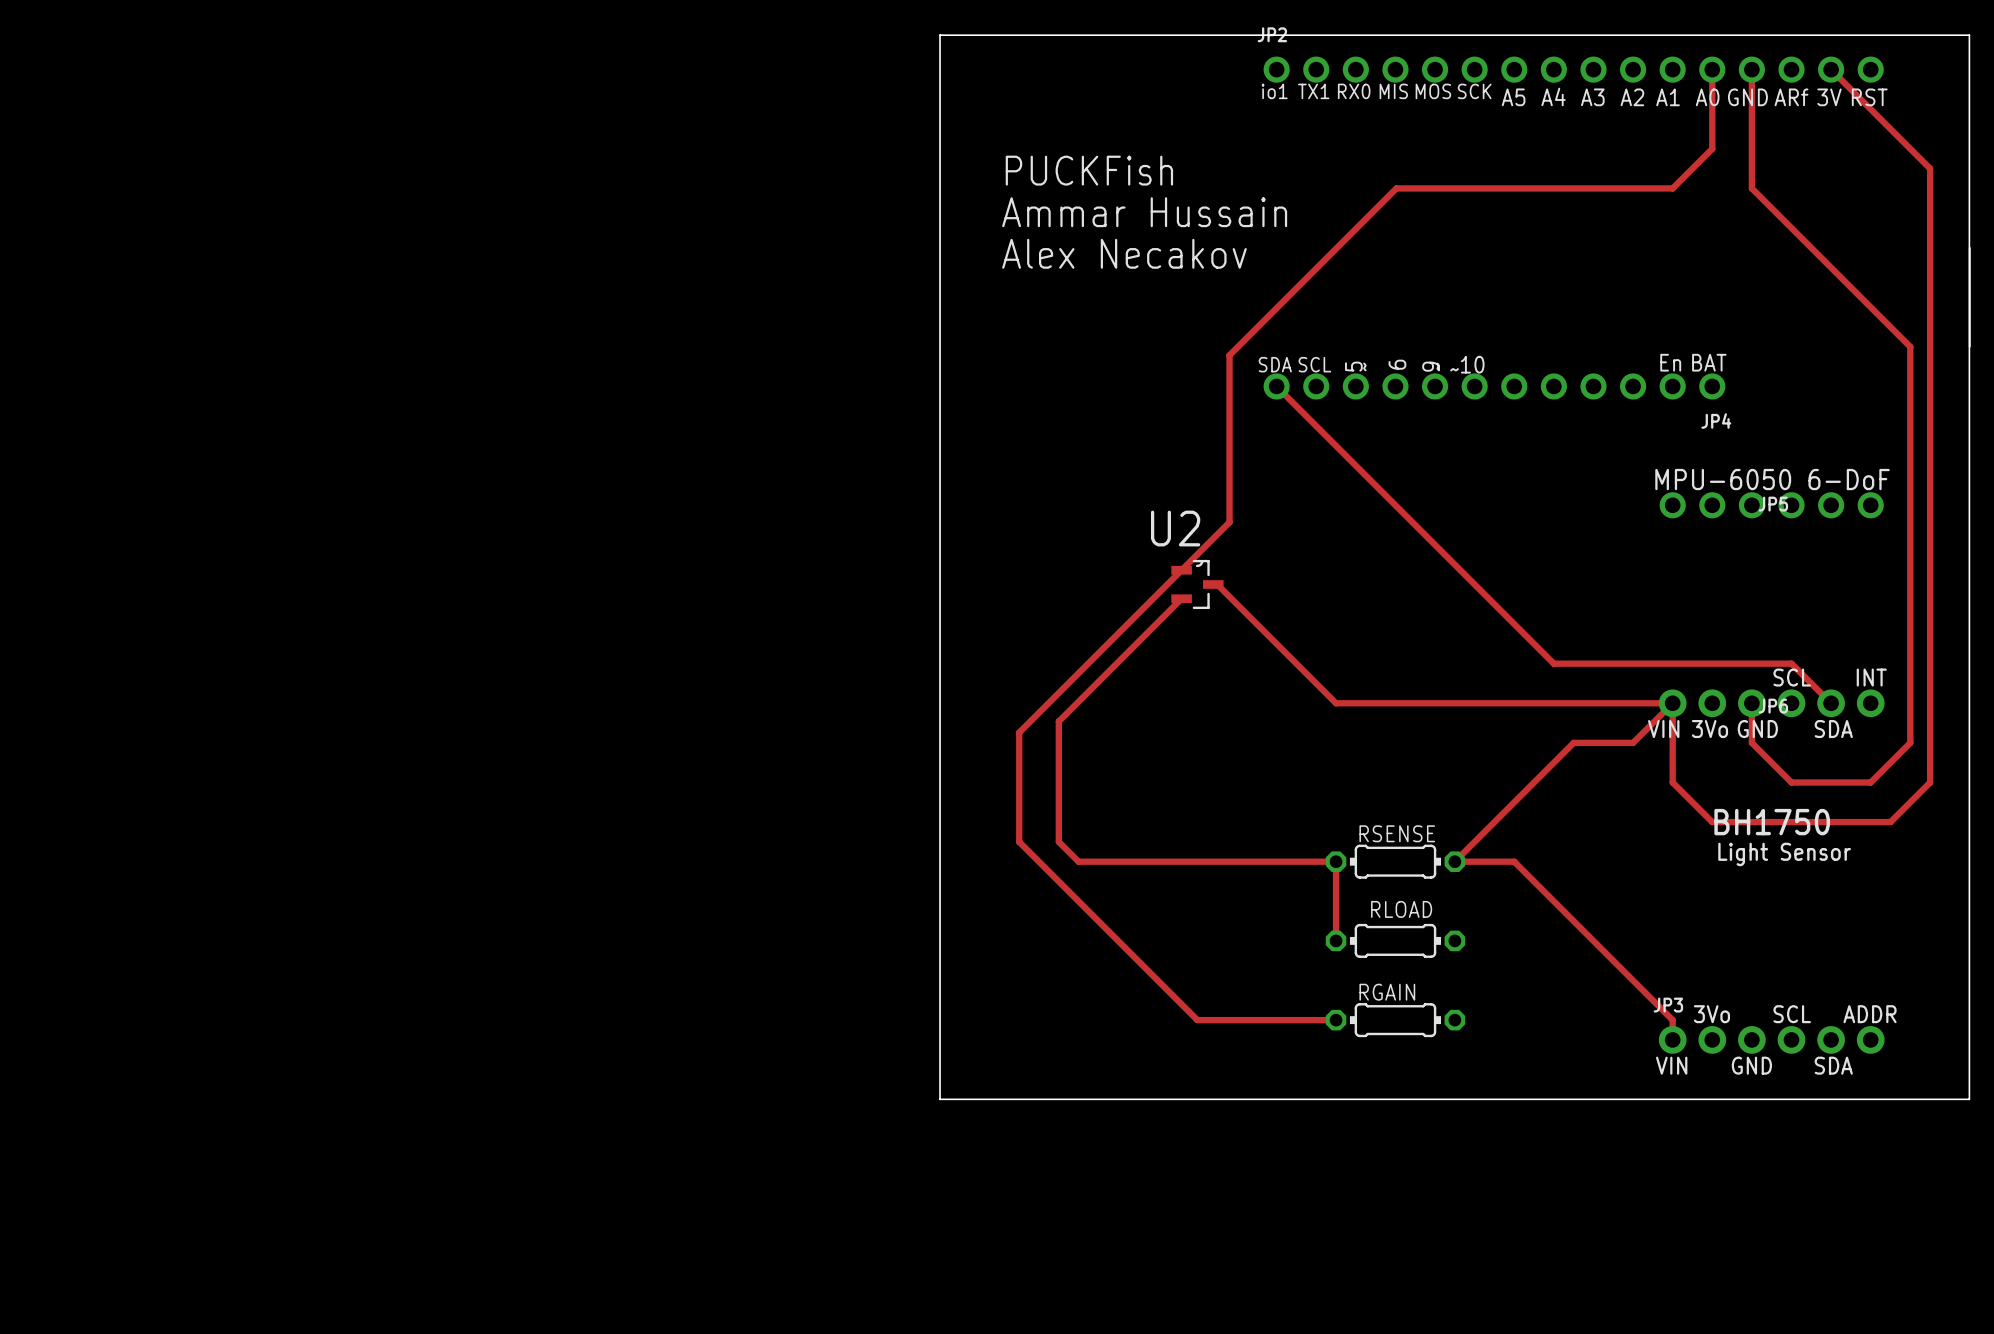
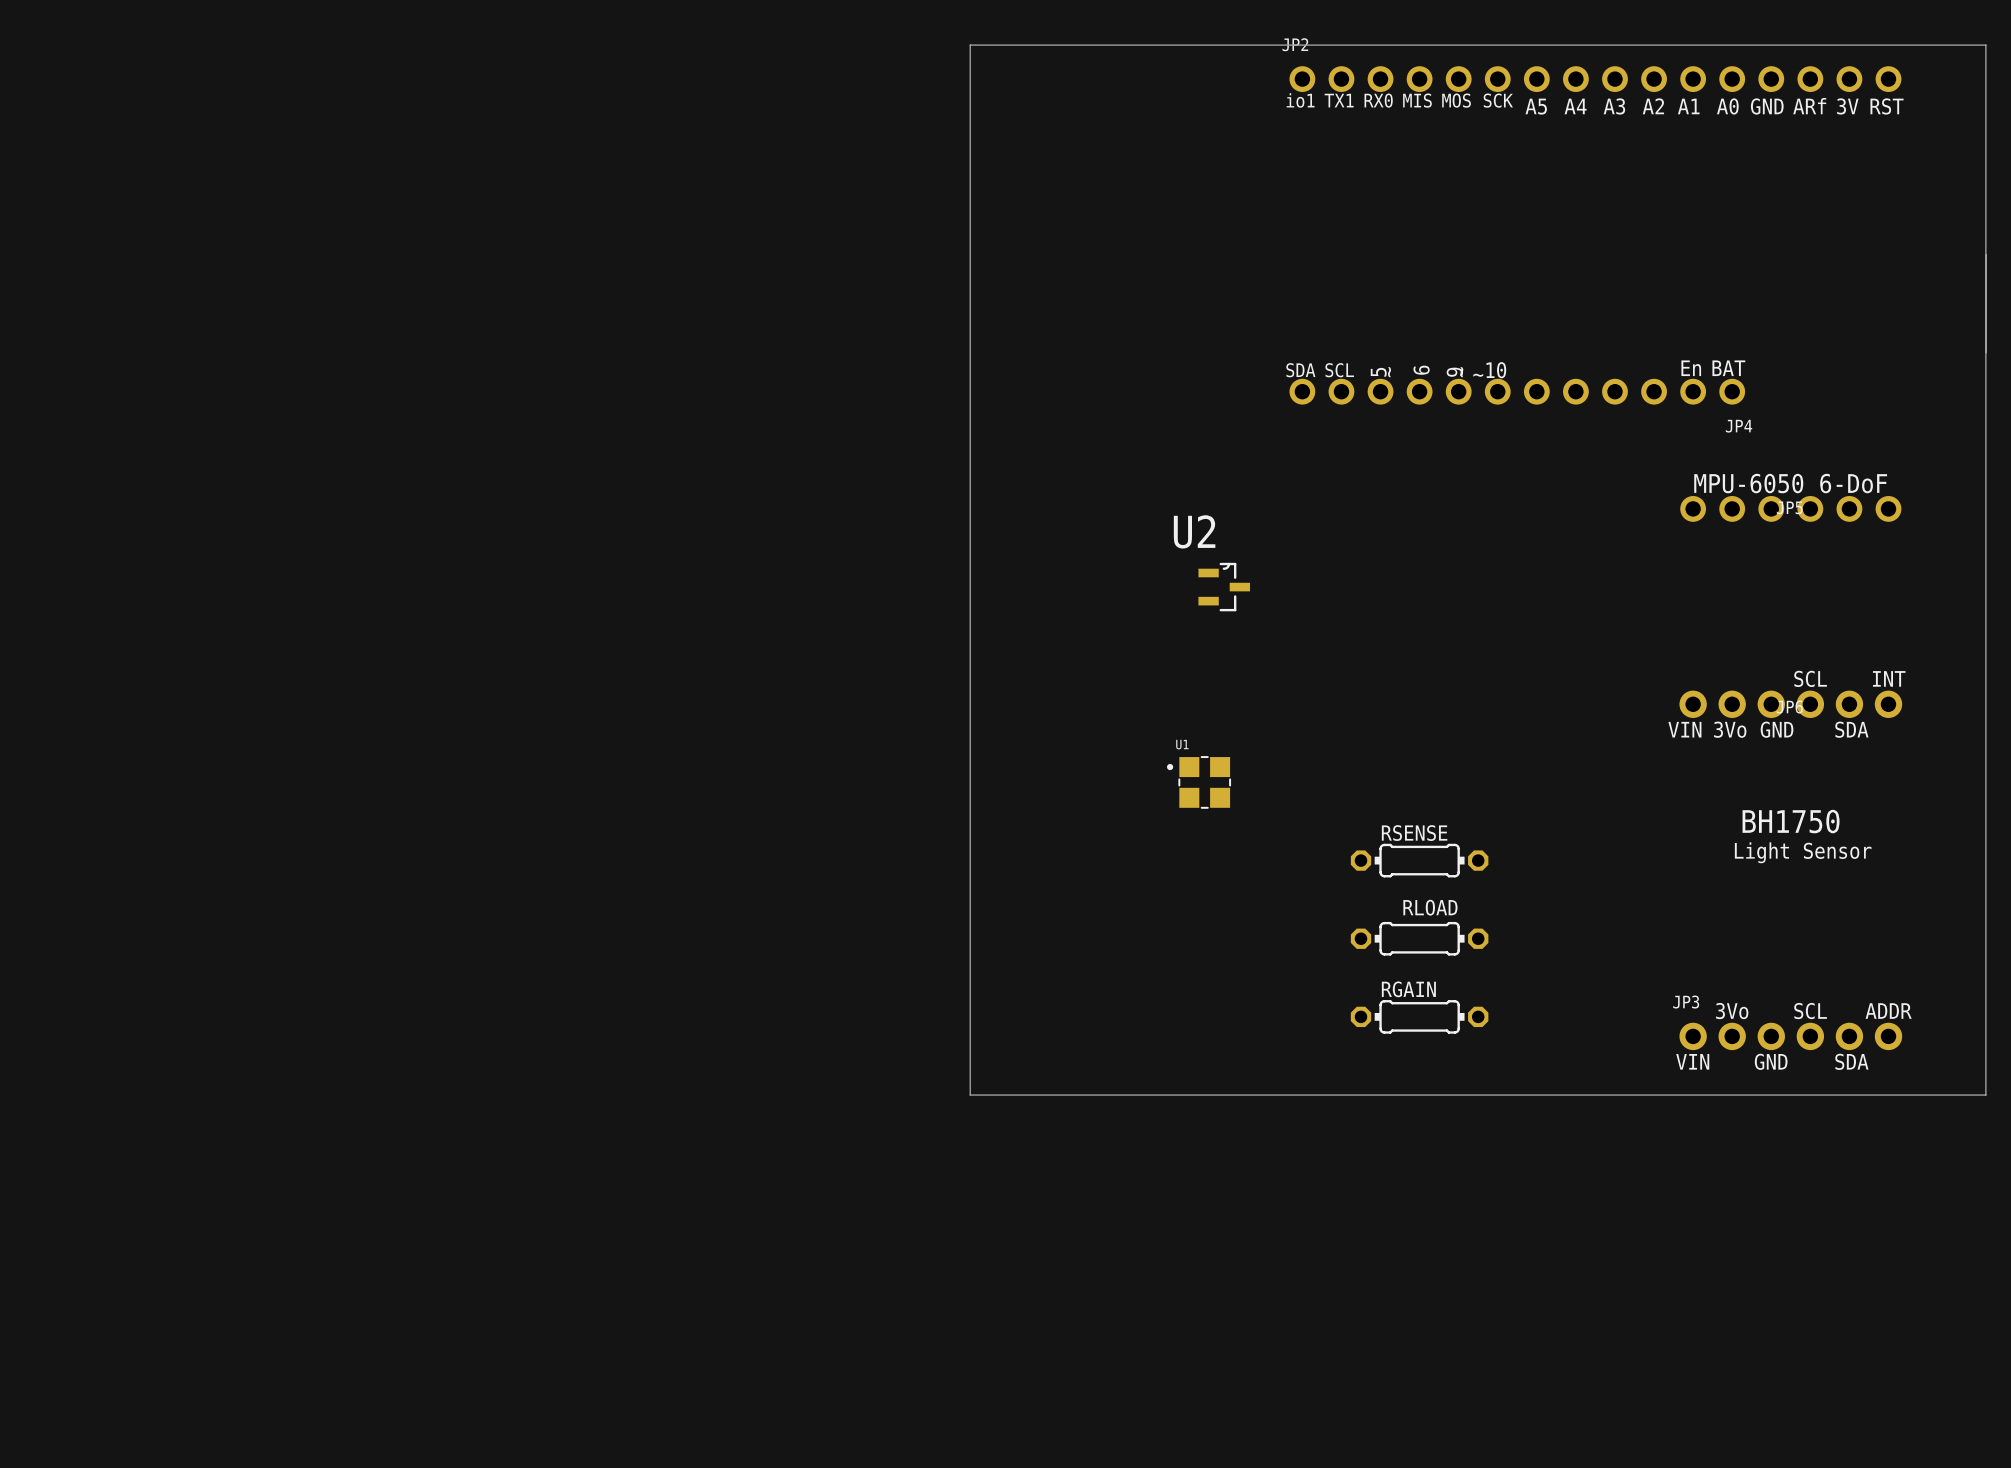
track: (1712, 69) (1712, 148) (1672, 188) (1396, 188) (1229, 355) (1229, 522) (1019, 732) (1019, 841) (1197, 1020) (1336, 1020) -> none
track: (1751, 69) (1751, 188) (1910, 346) (1910, 742) (1870, 782) (1791, 782) (1751, 742) (1751, 703) -> none
track: (1831, 69) (1930, 168) (1930, 782) (1890, 822) (1712, 822) (1672, 782) (1672, 703) -> none
text: PUCKFish (1089, 170) -> none
text: Ammar Hussain (1144, 212) -> none
text: Alex Necakov (1124, 253) -> none
track: (1276, 386) (1553, 663) (1791, 663) (1831, 703) -> none
track: (1213, 584) (1217, 584) (1336, 703) (1672, 703) -> none
track: (1181, 598) (1058, 721) (1058, 841) (1078, 861) (1336, 861) (1336, 940) -> none
track: (1672, 703) (1633, 742) (1573, 742) (1454, 861) (1514, 861) (1672, 1020) (1672, 1039) -> none
U1: none -> (1199, 782)

